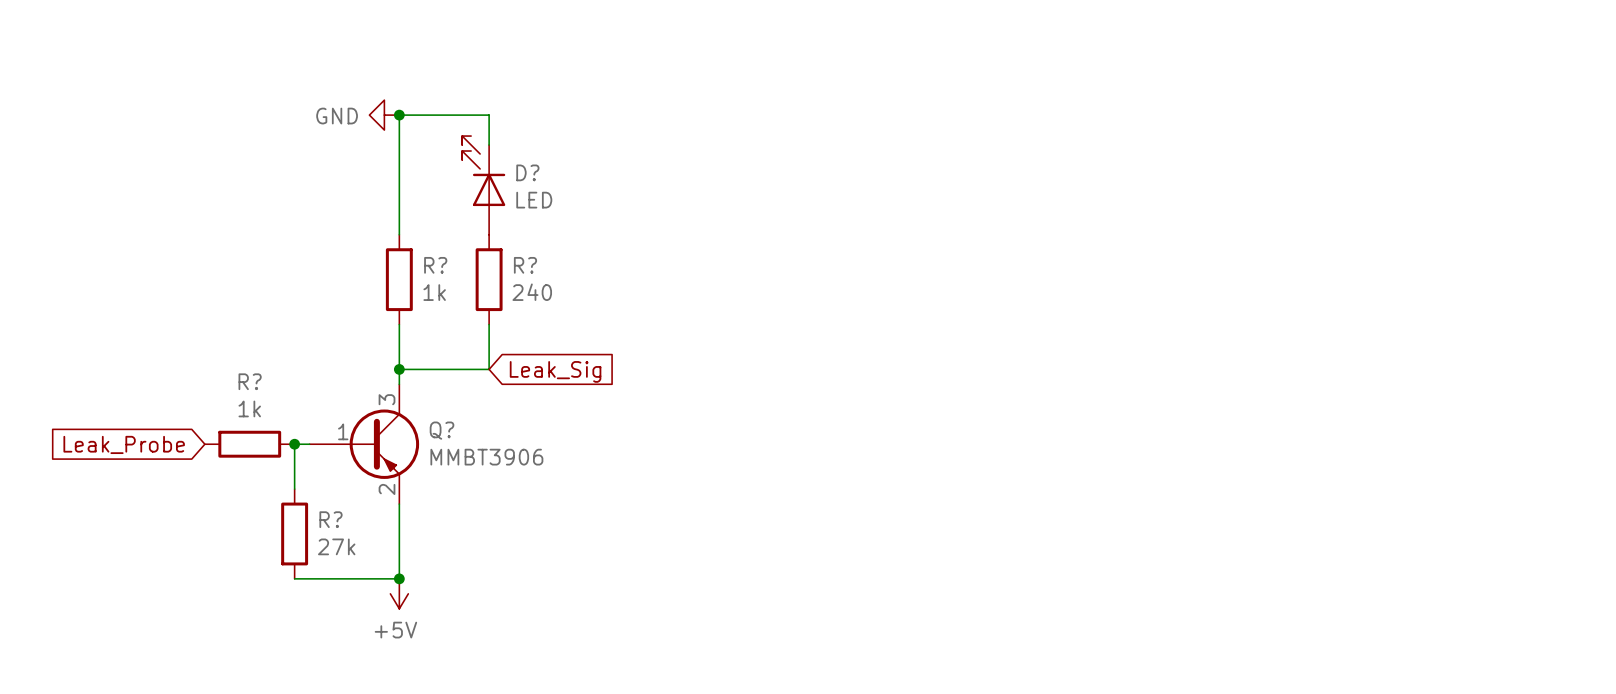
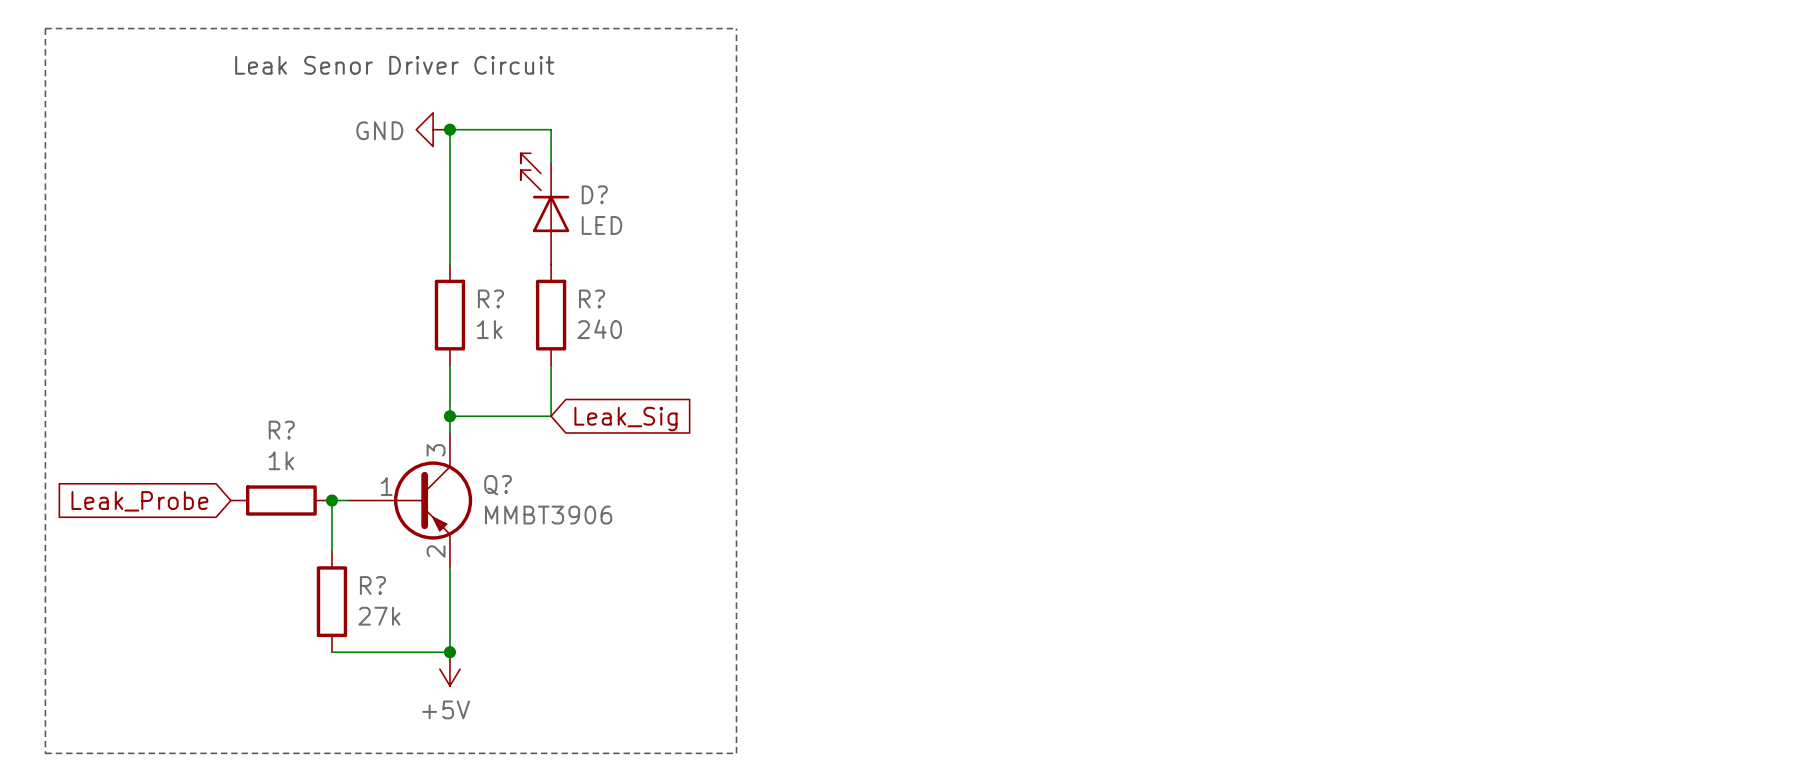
line: none -> (45, 28) (45, 753) (736, 753) (736, 28) (45, 28)
text: none -> Leak Senor Driver Circuit (394, 65)

